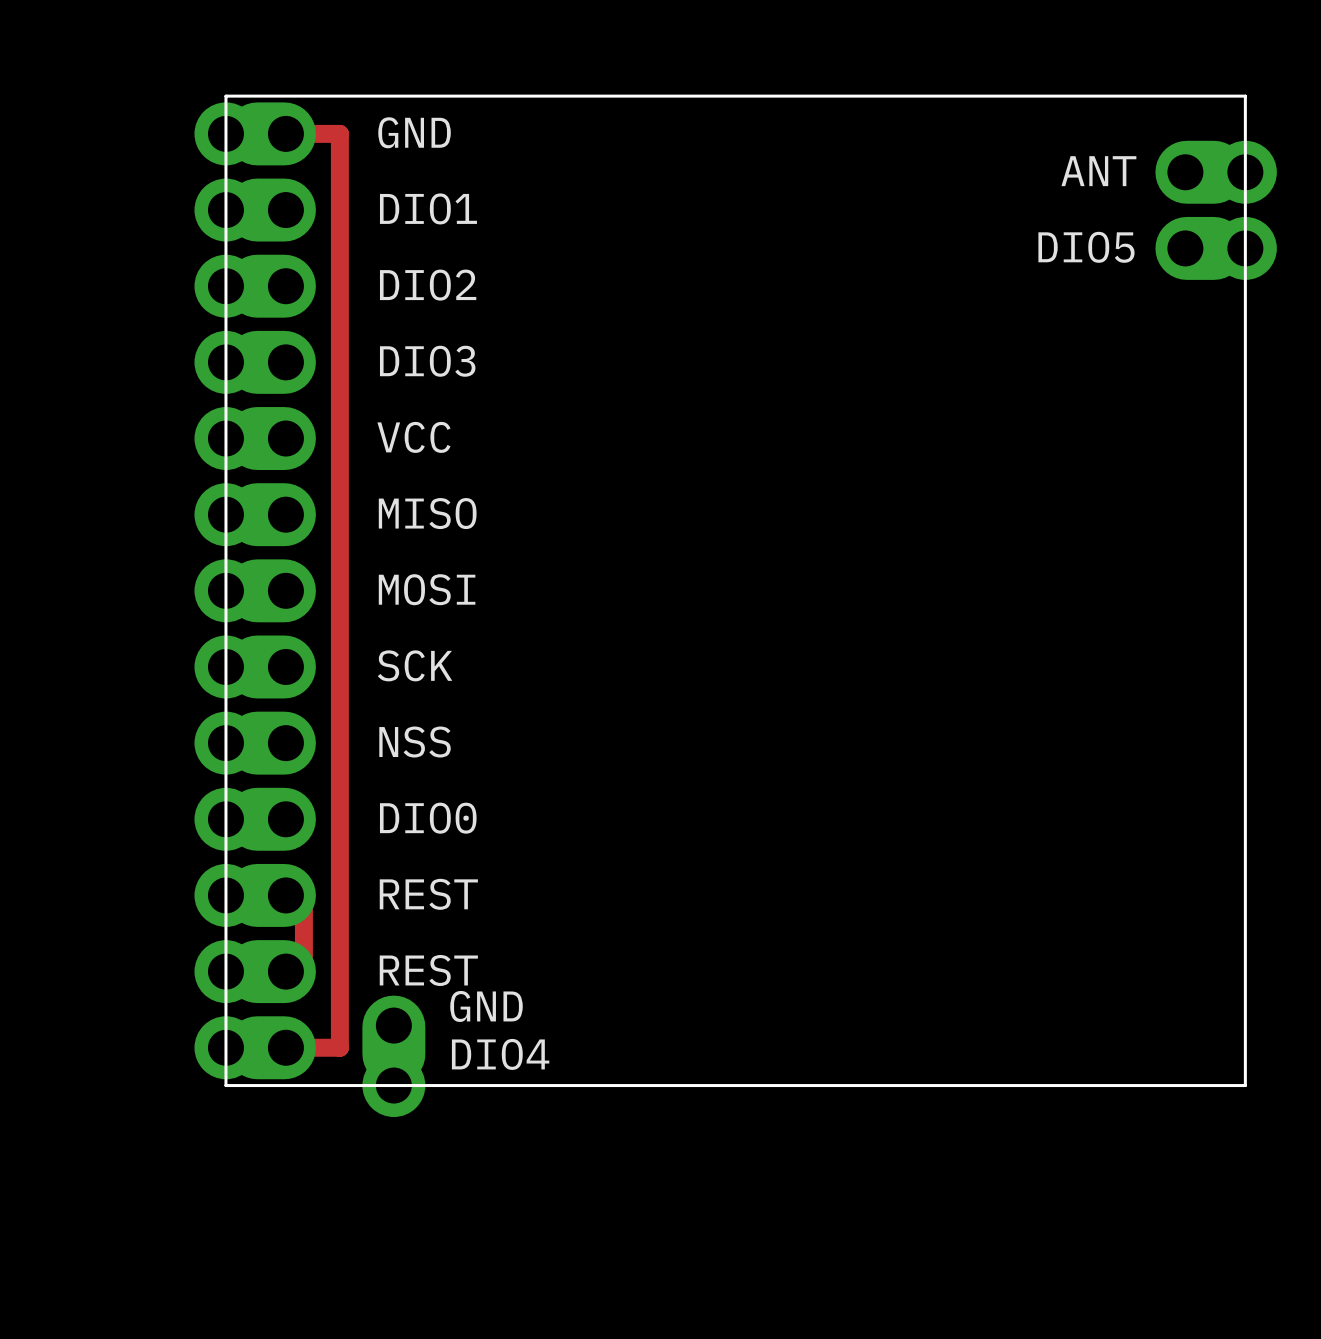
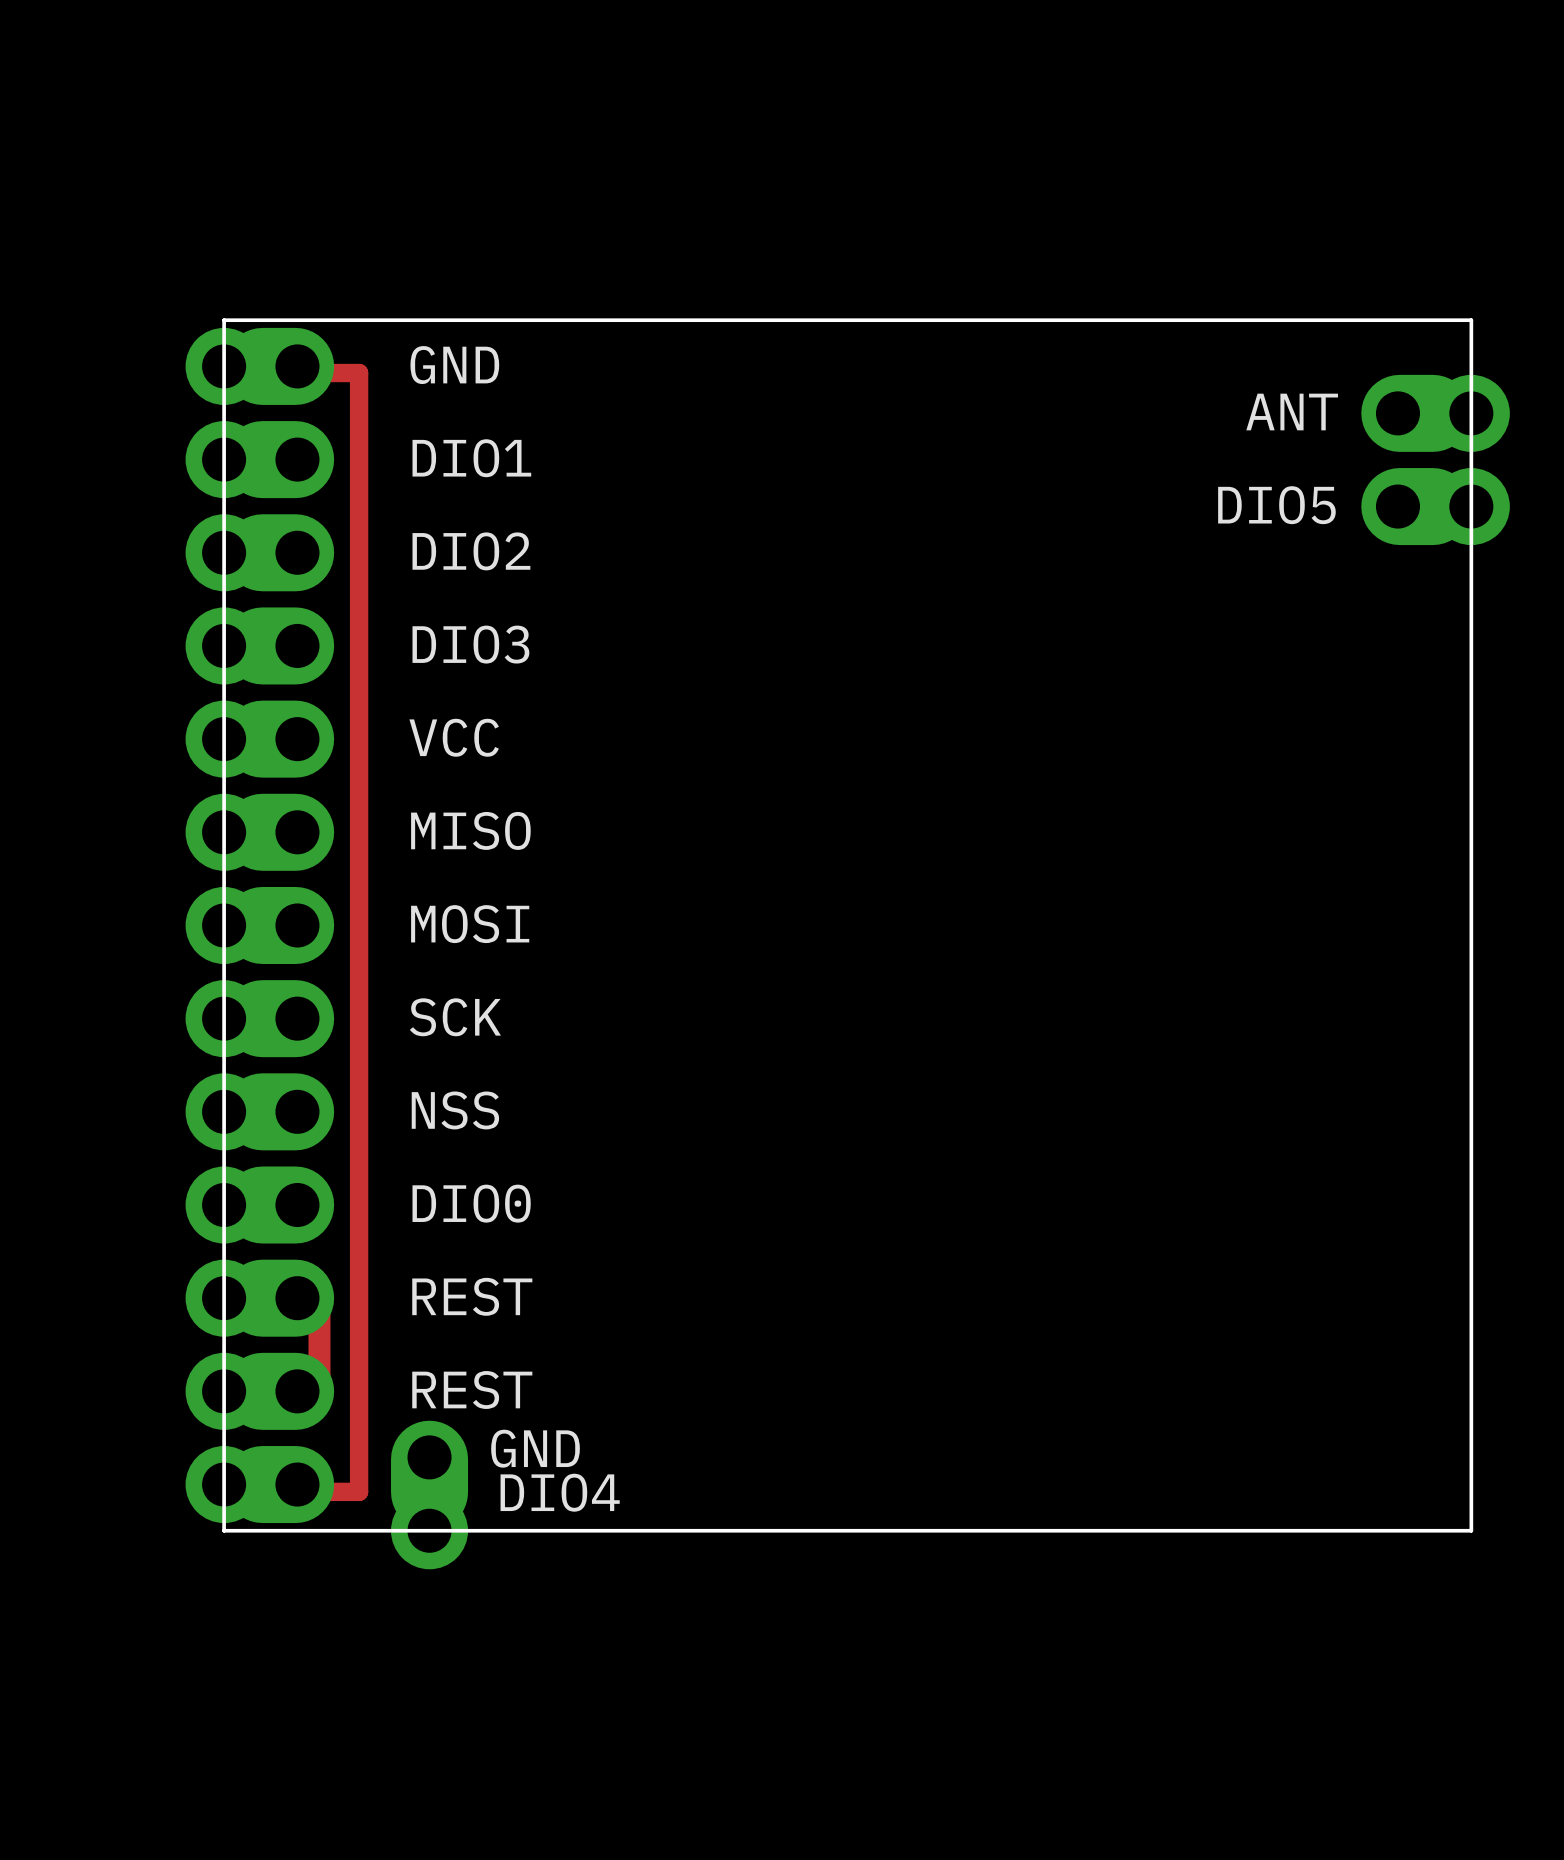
top track: (303, 133) (339, 133) (339, 1047) (303, 1047) -> none
top track: none -> (319, 373) (359, 373) (359, 1491) (319, 1491)
text position: GND (486, 1006) -> GND (535, 1448)

